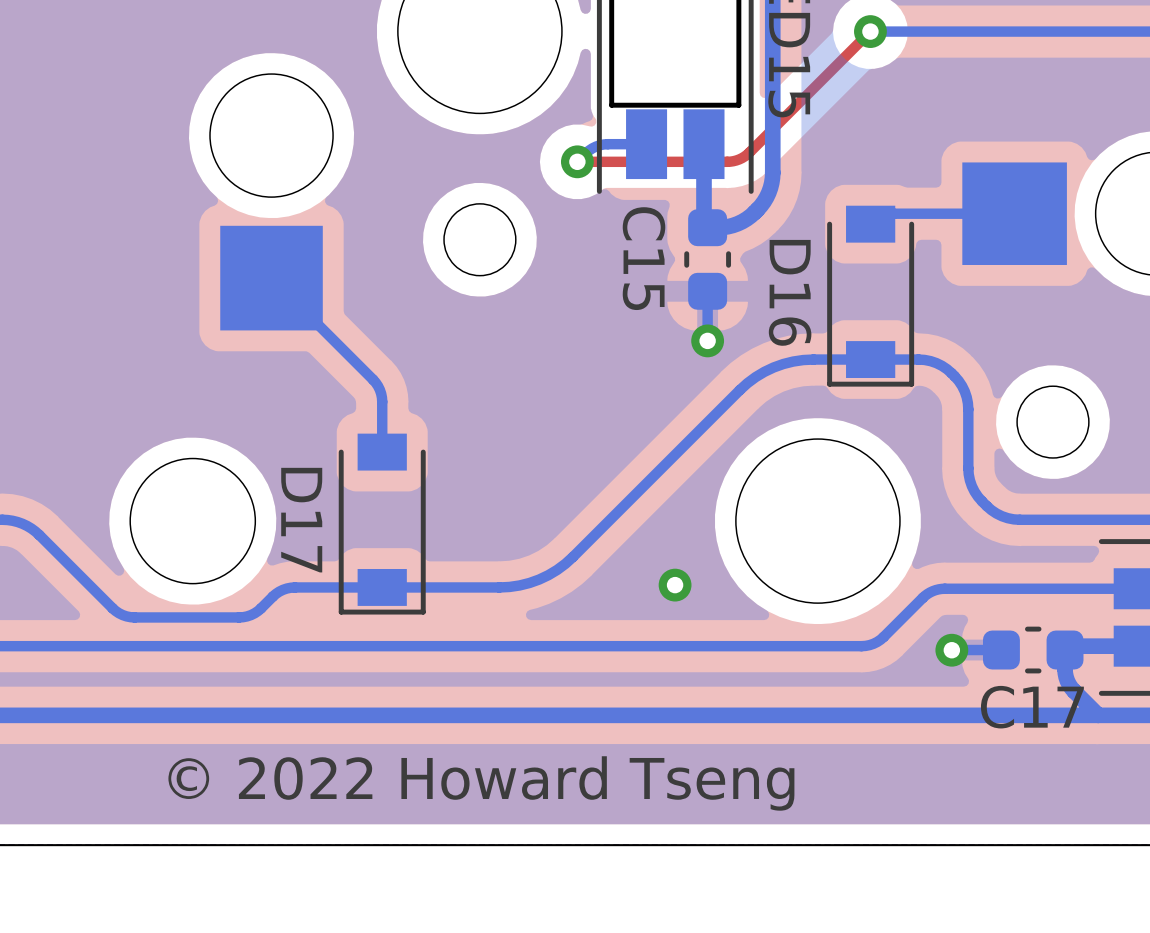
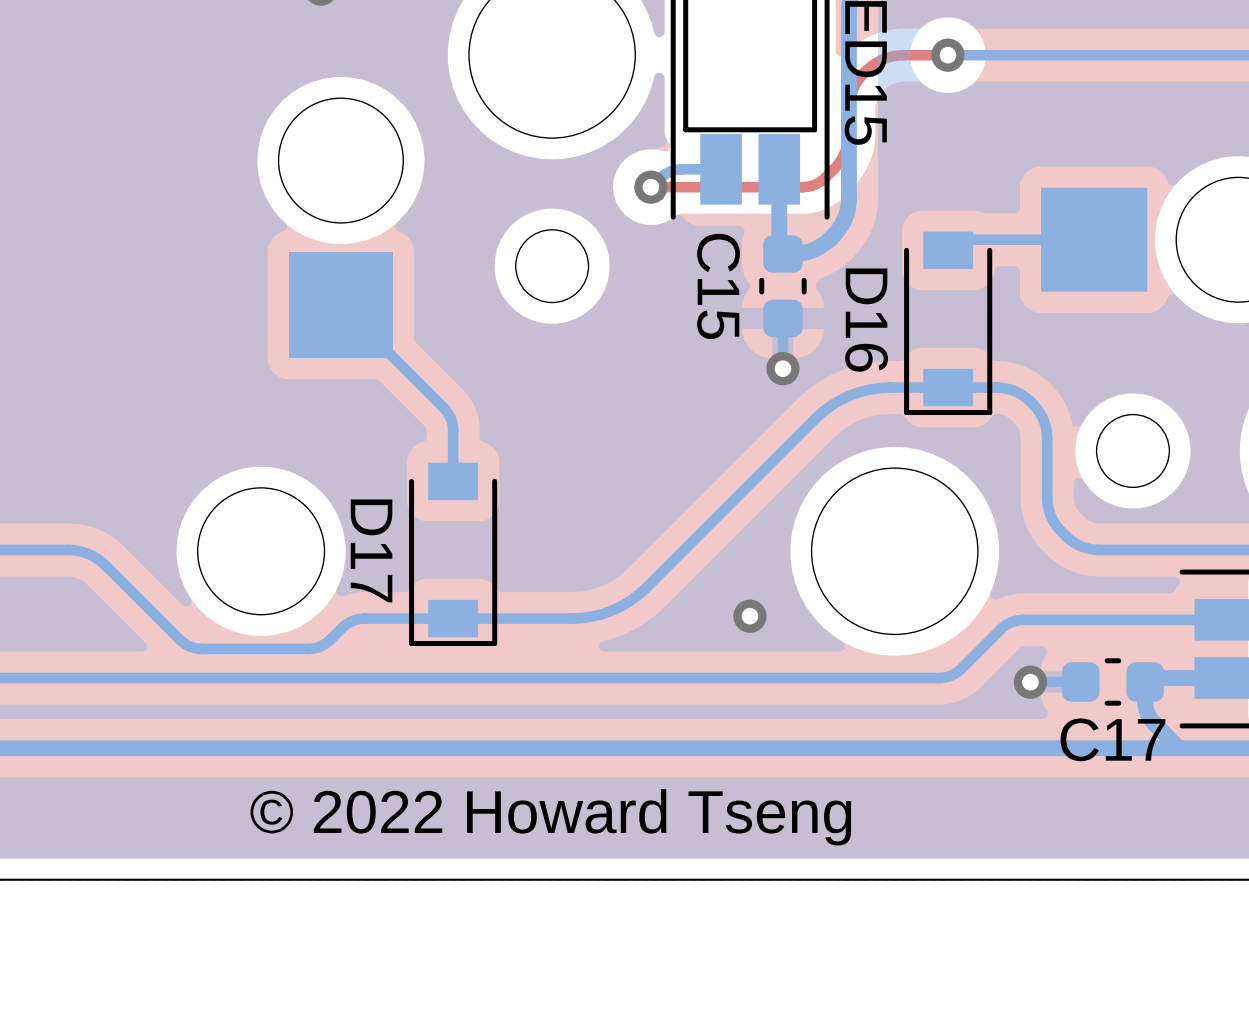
top track: (870, 31) (757, 144) -> (947, 55) (893, 56) (878, 61) (864, 72) (857, 80) (851, 94) (847, 142) (842, 157) (833, 169)

